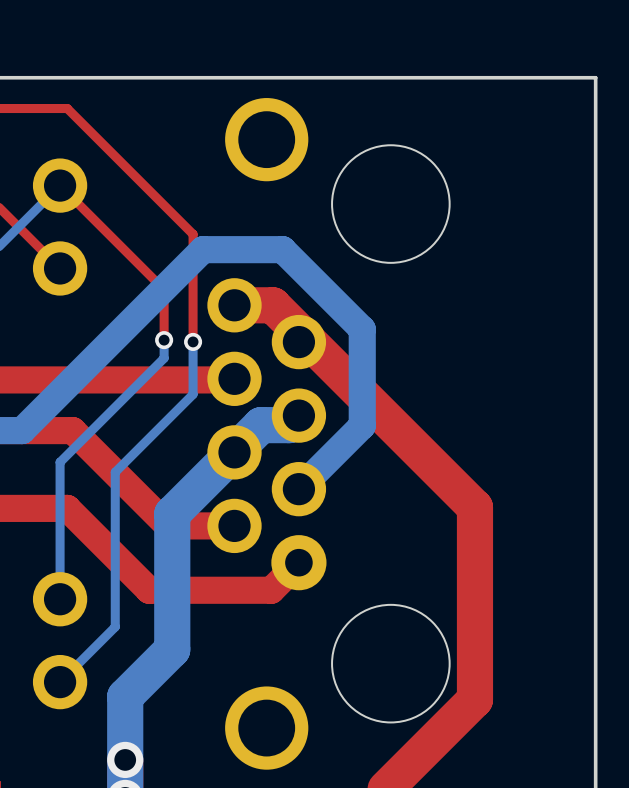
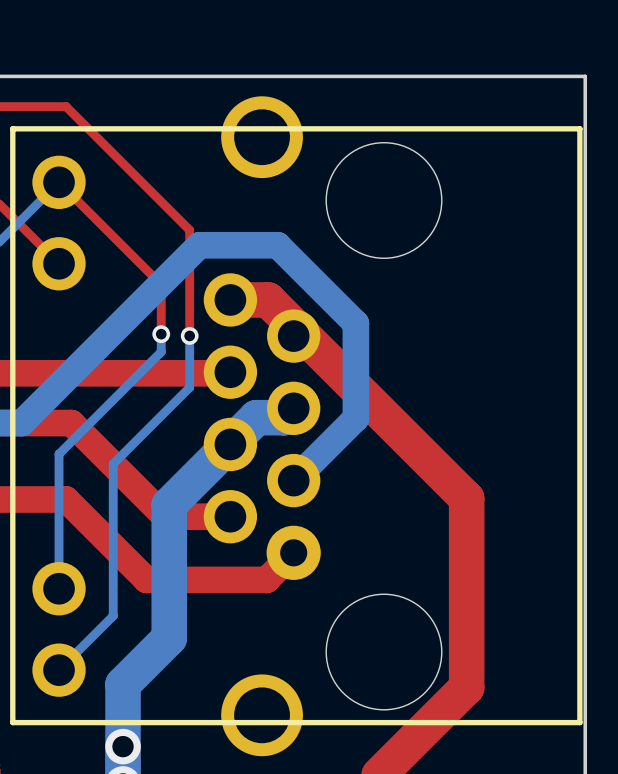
line: none -> (579, 128) (12, 128) (12, 722) (579, 722) (579, 128)

